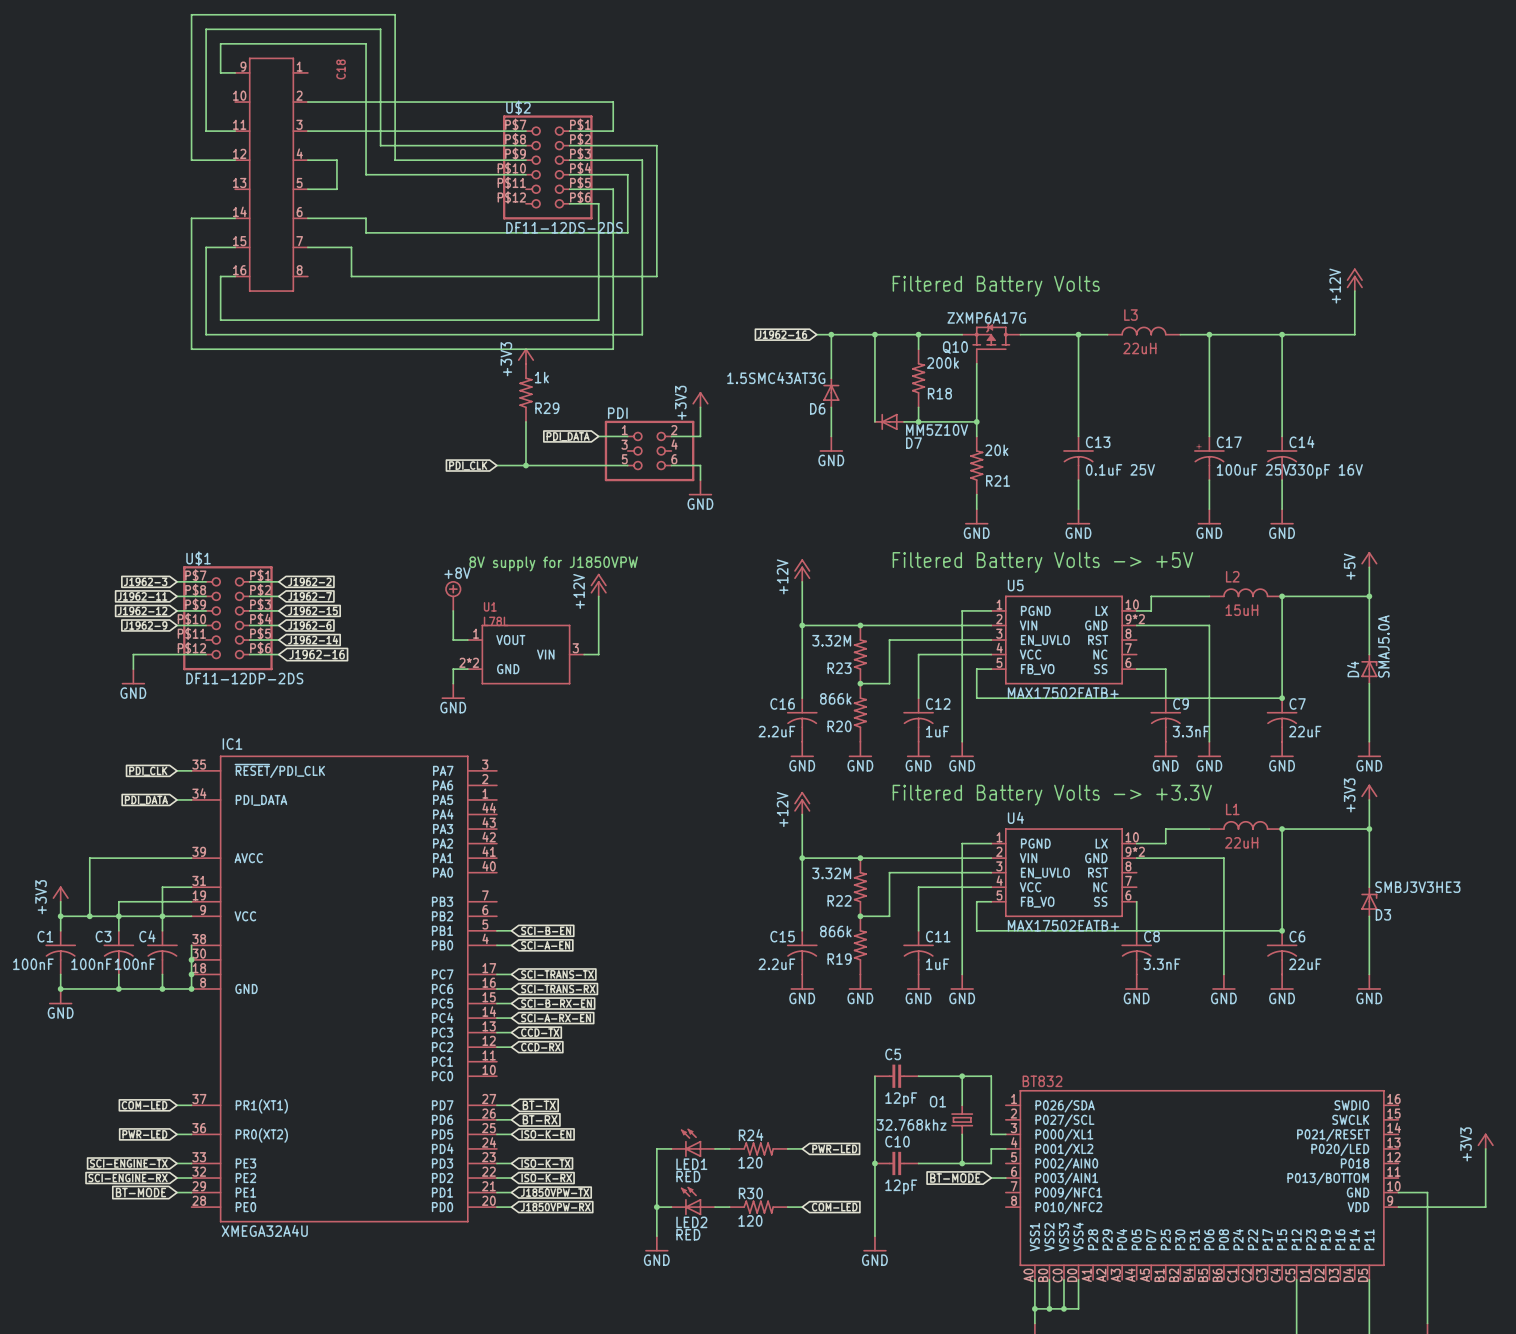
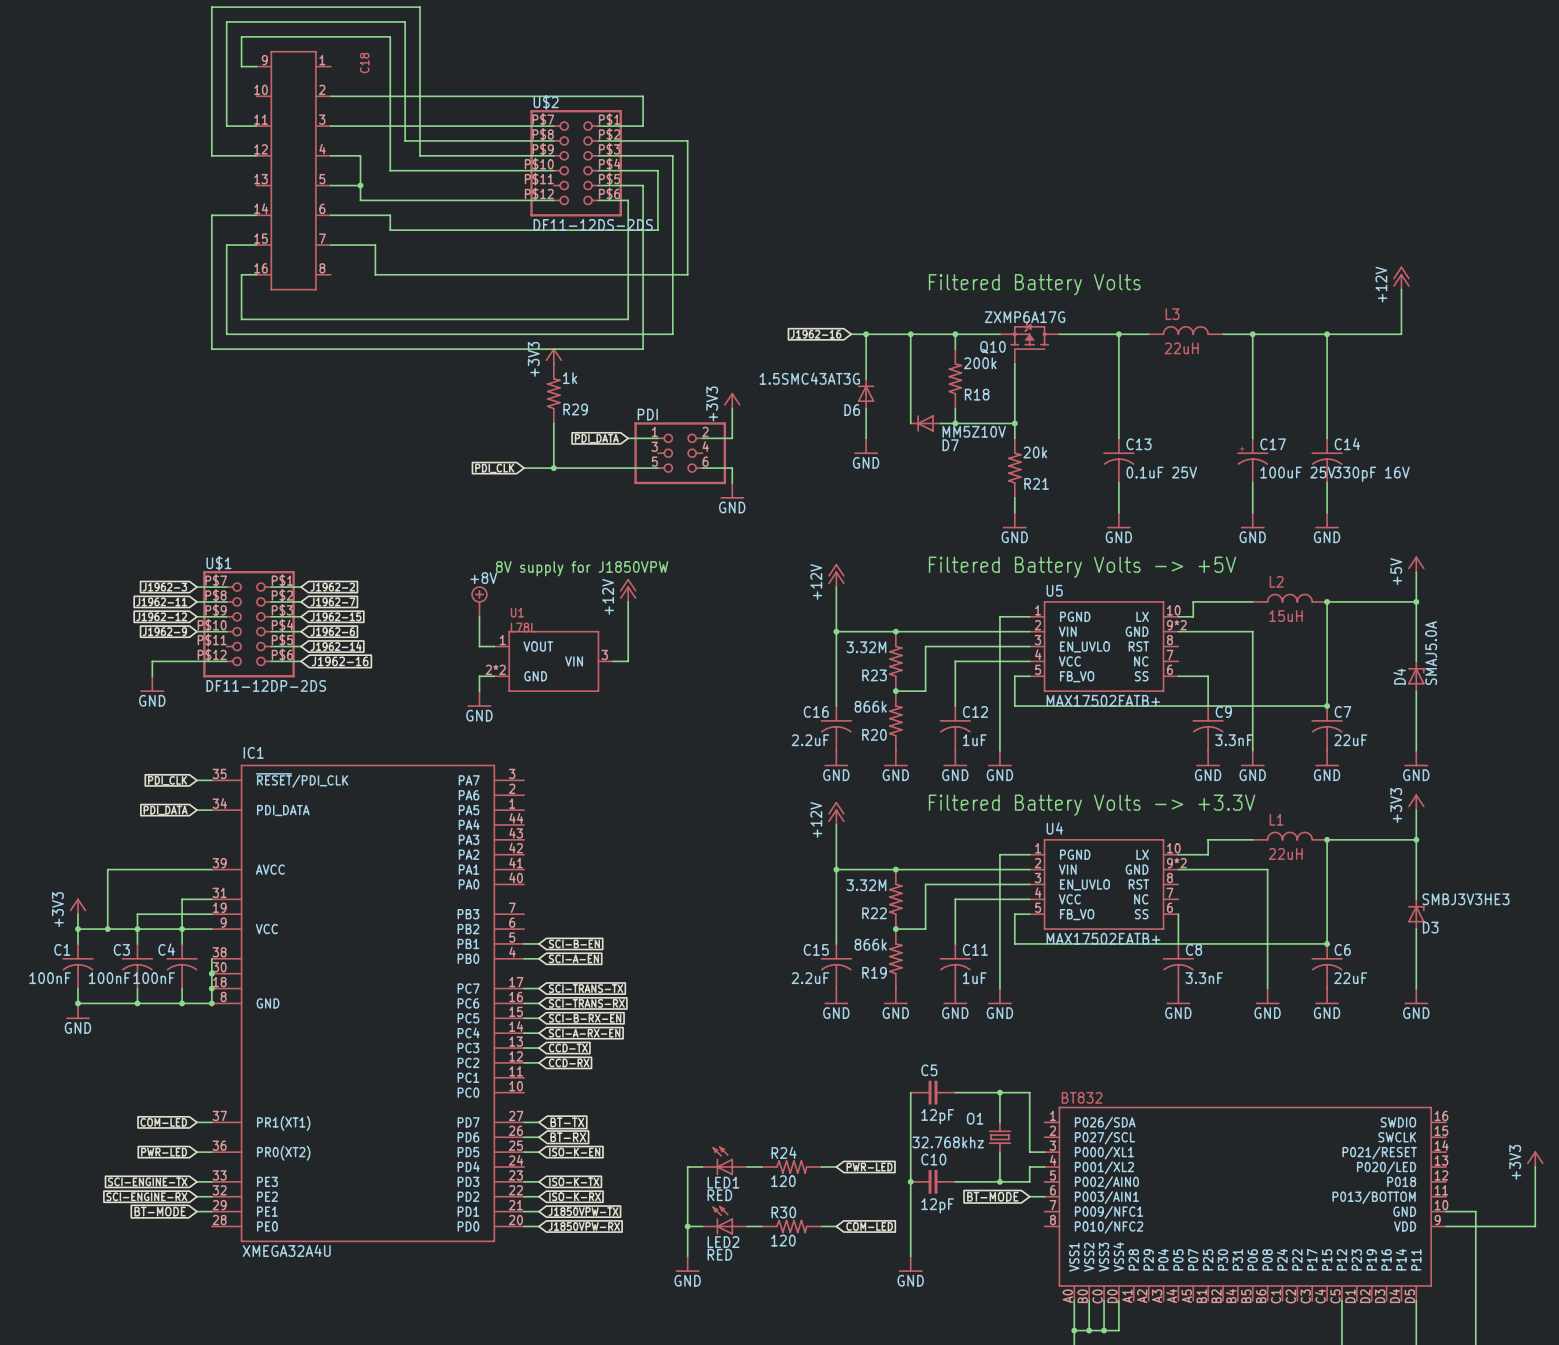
wire: none -> (360, 185) (360, 200) (553, 200)
junction: none -> (360, 185)

